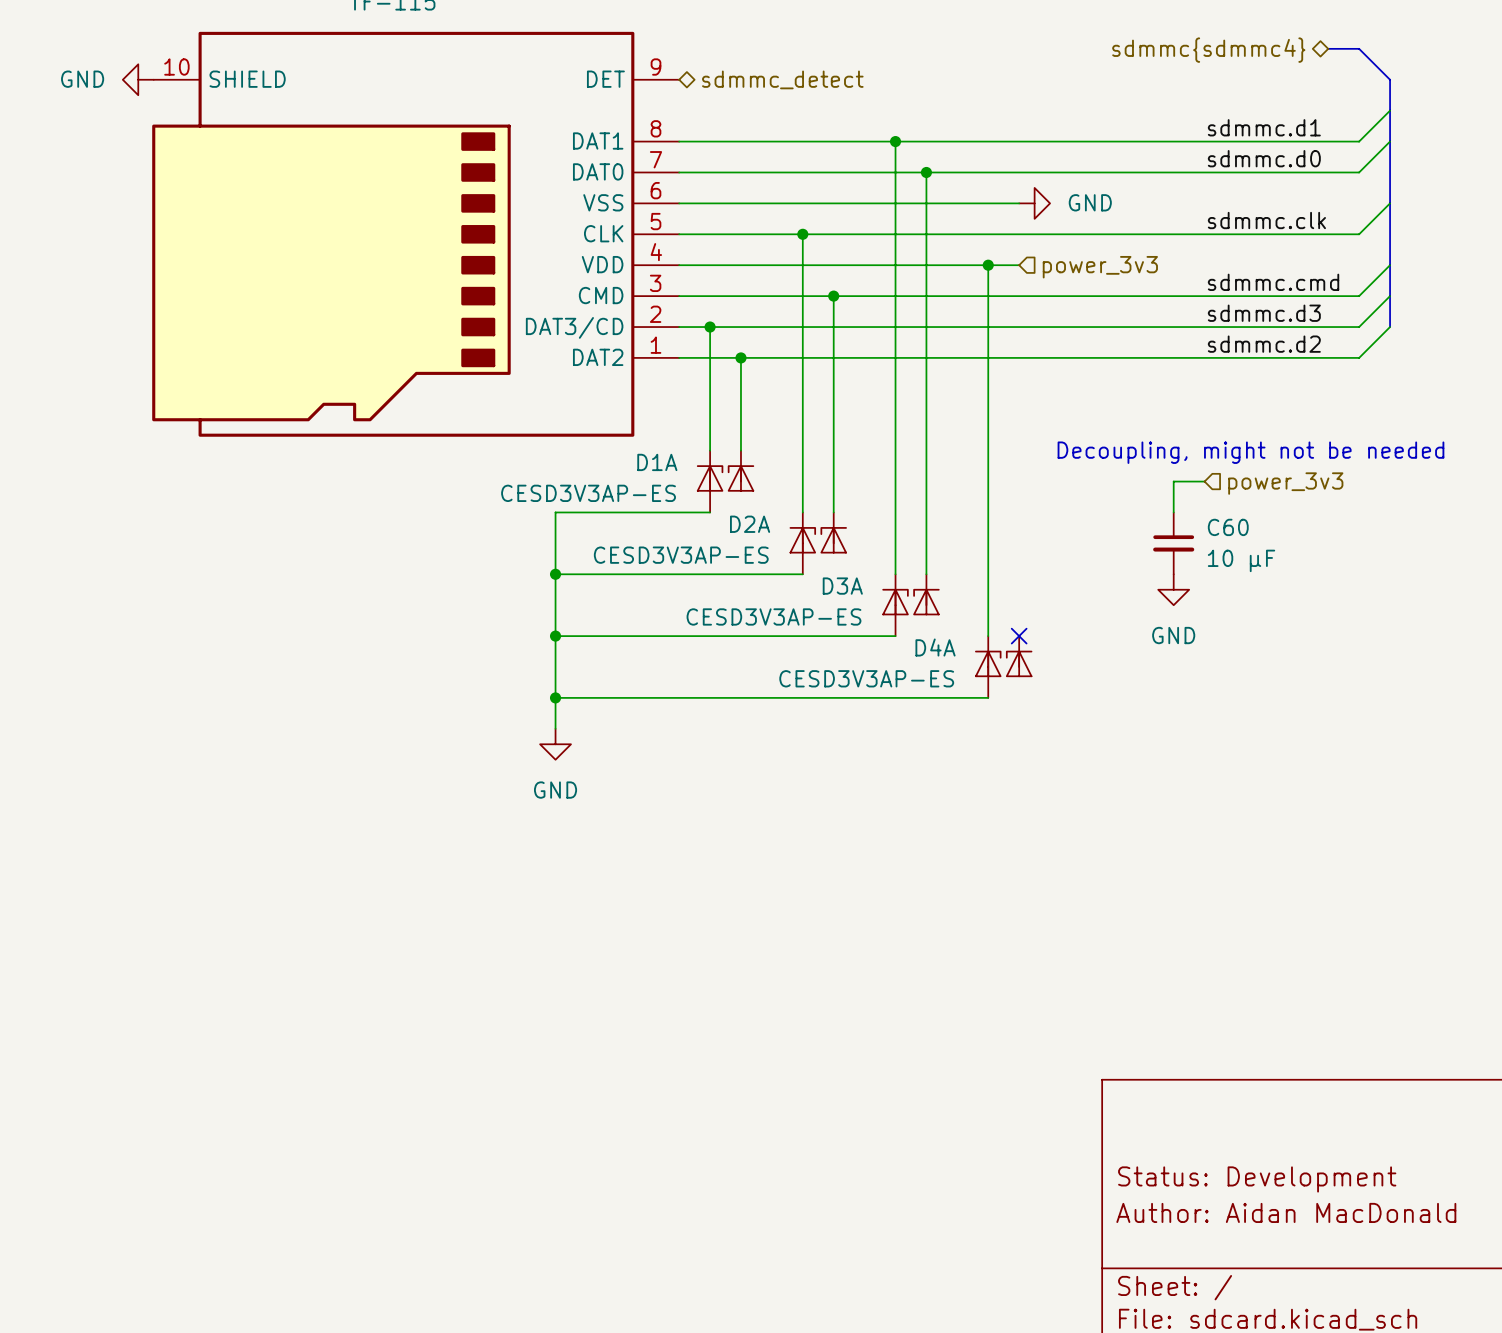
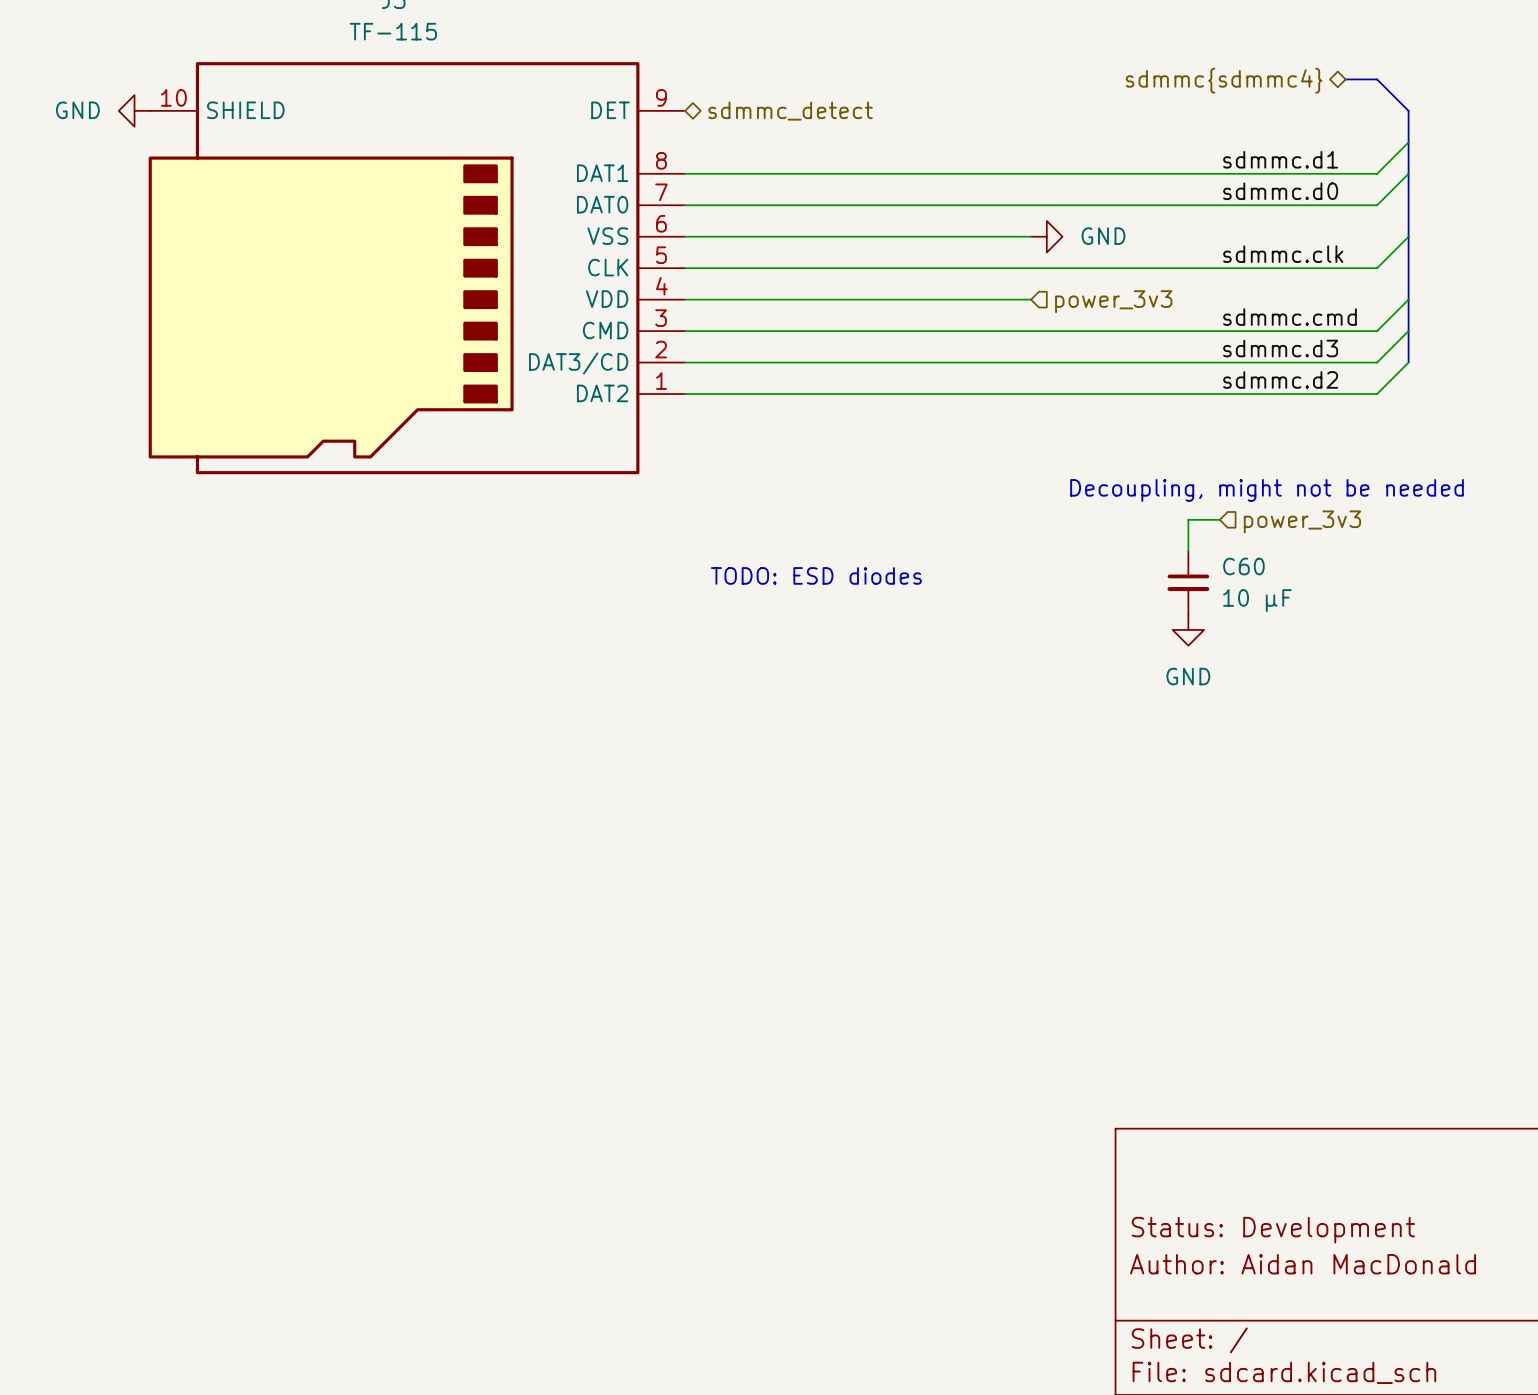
wire: (895, 141) (895, 574) -> none
junction: (895, 141) -> none
wire: (926, 172) (926, 574) -> none
junction: (926, 172) -> none
wire: (802, 234) (802, 512) -> none
junction: (802, 234) -> none
wire: (988, 265) (988, 636) -> none
junction: (988, 265) -> none
wire: (833, 296) (833, 512) -> none
junction: (833, 296) -> none
wire: (710, 327) (710, 450) -> none
junction: (710, 327) -> none
wire: (740, 357) (740, 450) -> none
junction: (740, 357) -> none
part: (740, 470) -> none
D1A: CESD3V3AP-ES (710, 481) -> none
wire: (710, 512) (555, 512) (555, 728) -> none
part: (833, 532) -> none
text: none -> TODO: ESD diodes (816, 575)
D2A: CESD3V3AP-ES (802, 543) -> none
wire: (555, 574) (802, 574) -> none
junction: (555, 574) -> none
part: (926, 594) -> none
D3A: CESD3V3AP-ES (895, 605) -> none
wire: (555, 636) (895, 636) -> none
junction: (555, 636) -> none
no-connect mark: (1019, 636) -> none
part: (1019, 656) -> none
D4A: CESD3V3AP-ES (988, 667) -> none
wire: (555, 697) (988, 697) -> none
junction: (555, 697) -> none
power symbol: GND (555, 744) -> none

